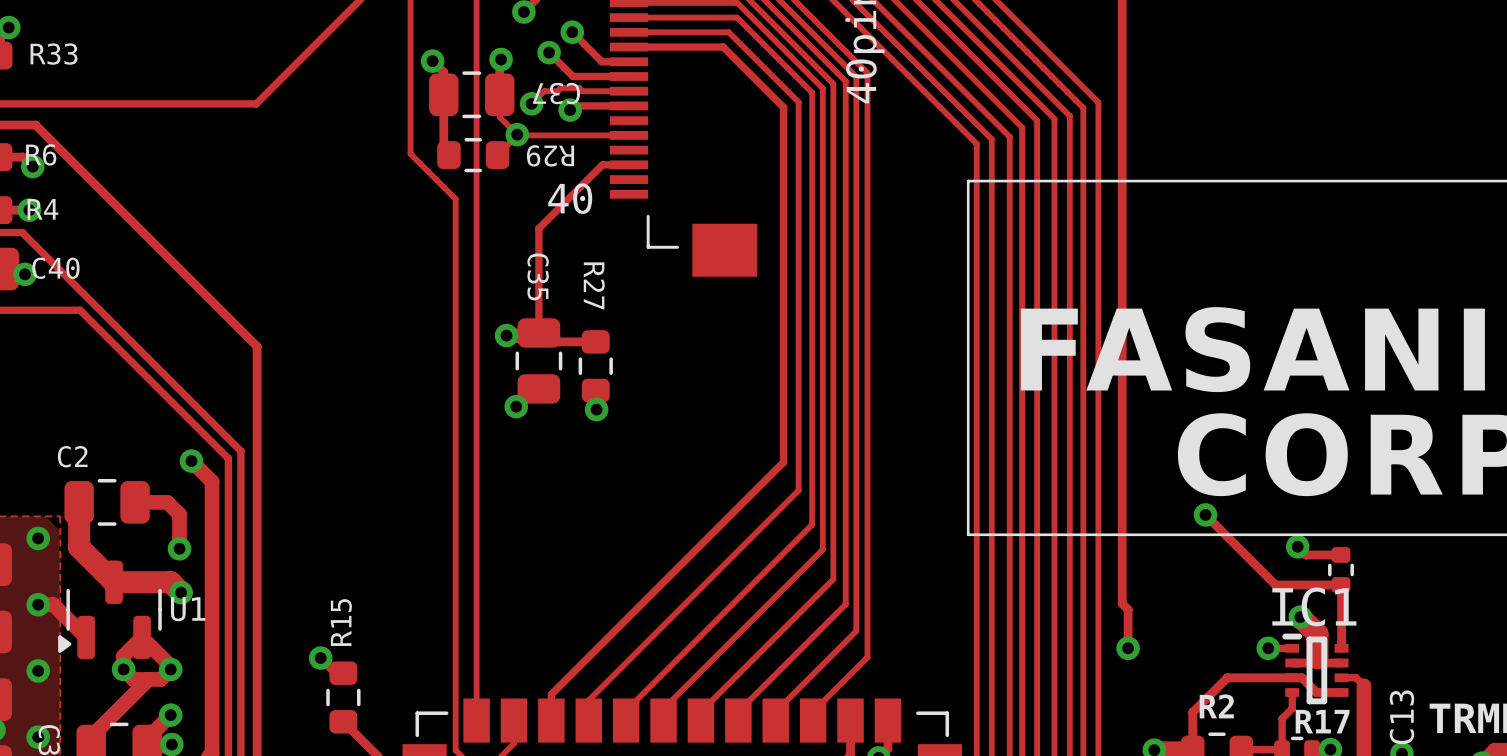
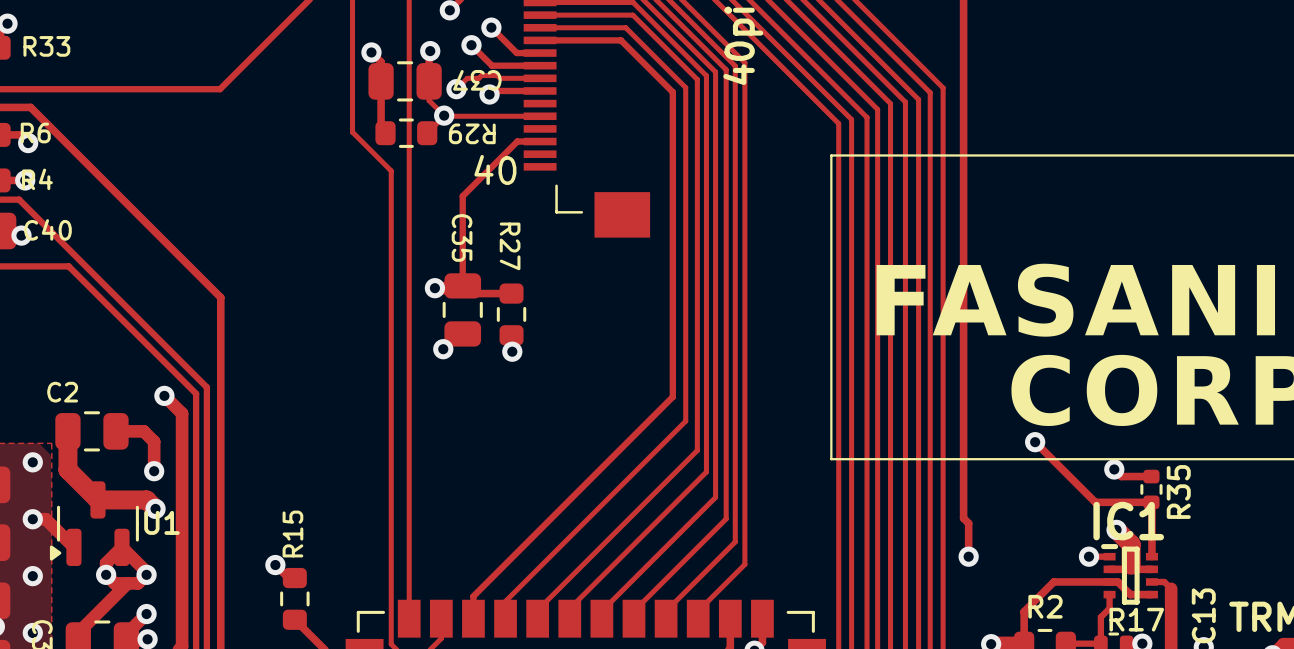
R35 name: none -> R35 (1178, 491)

